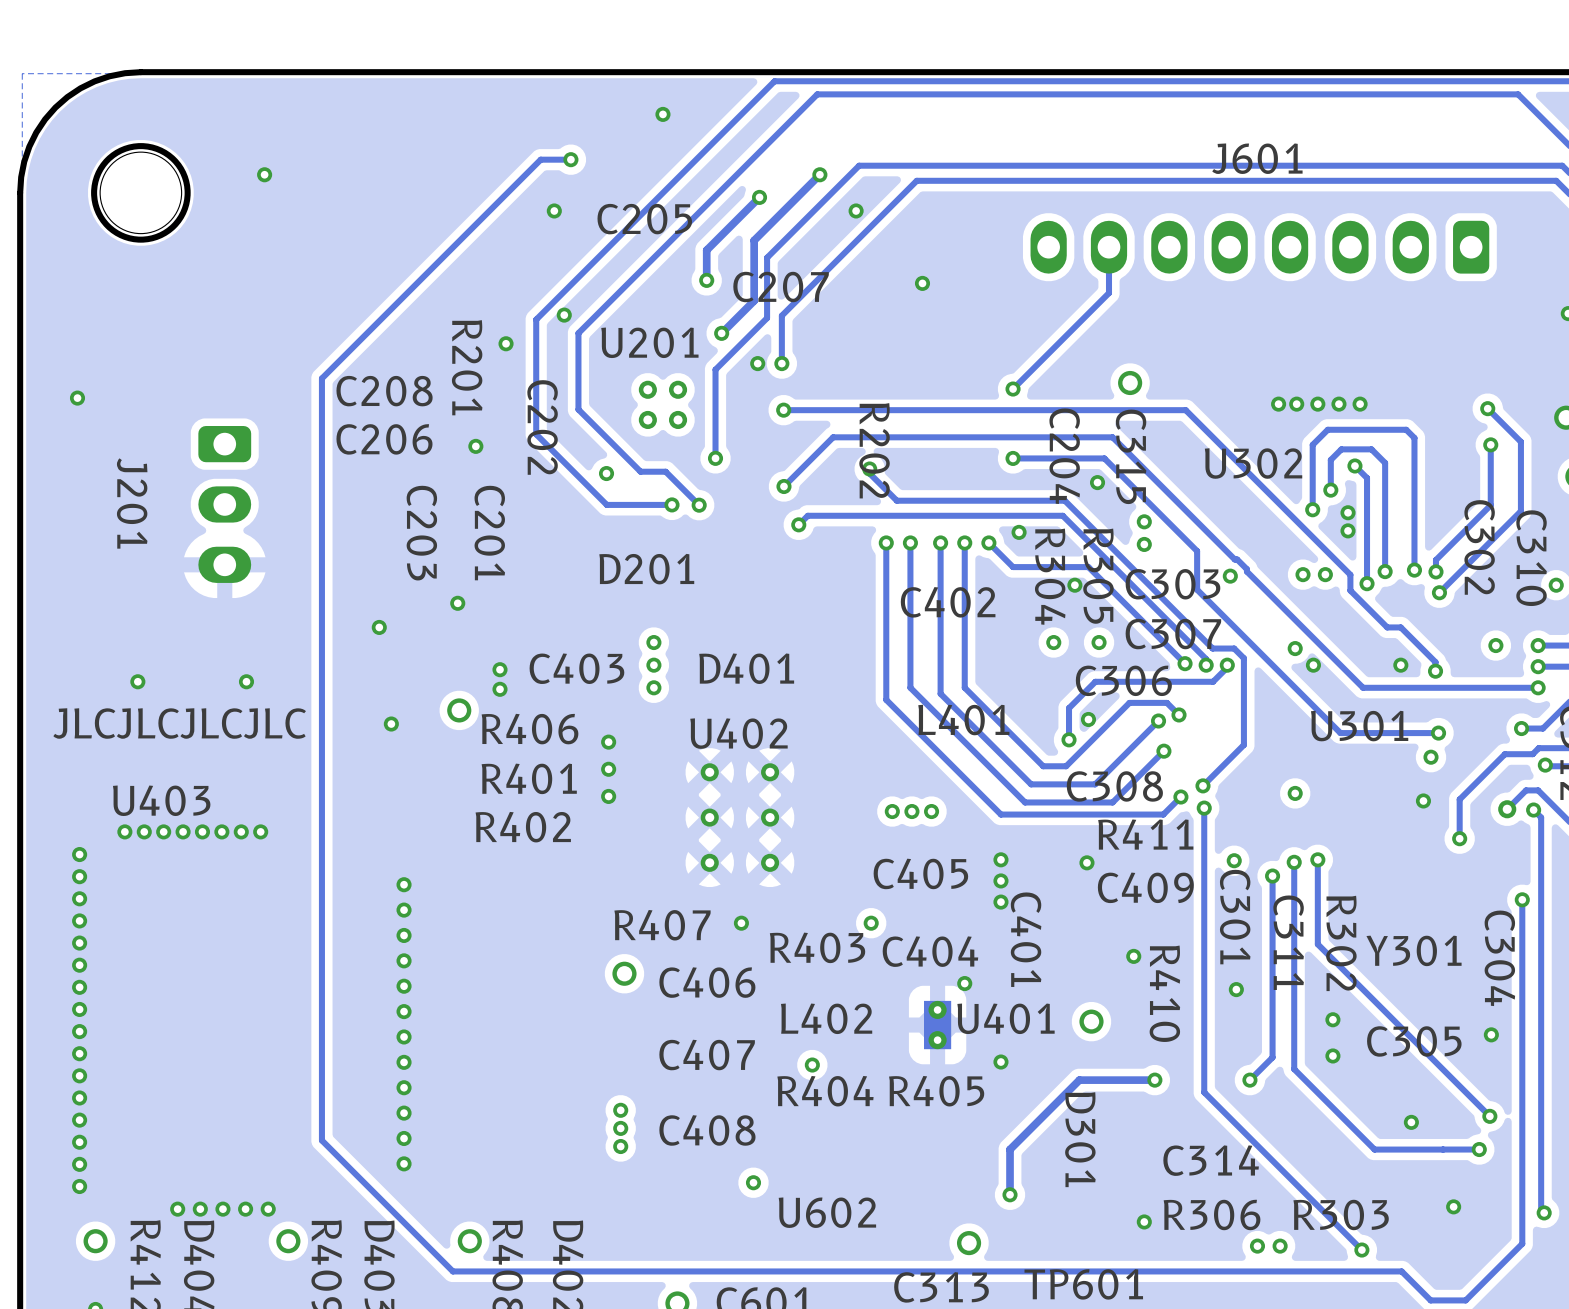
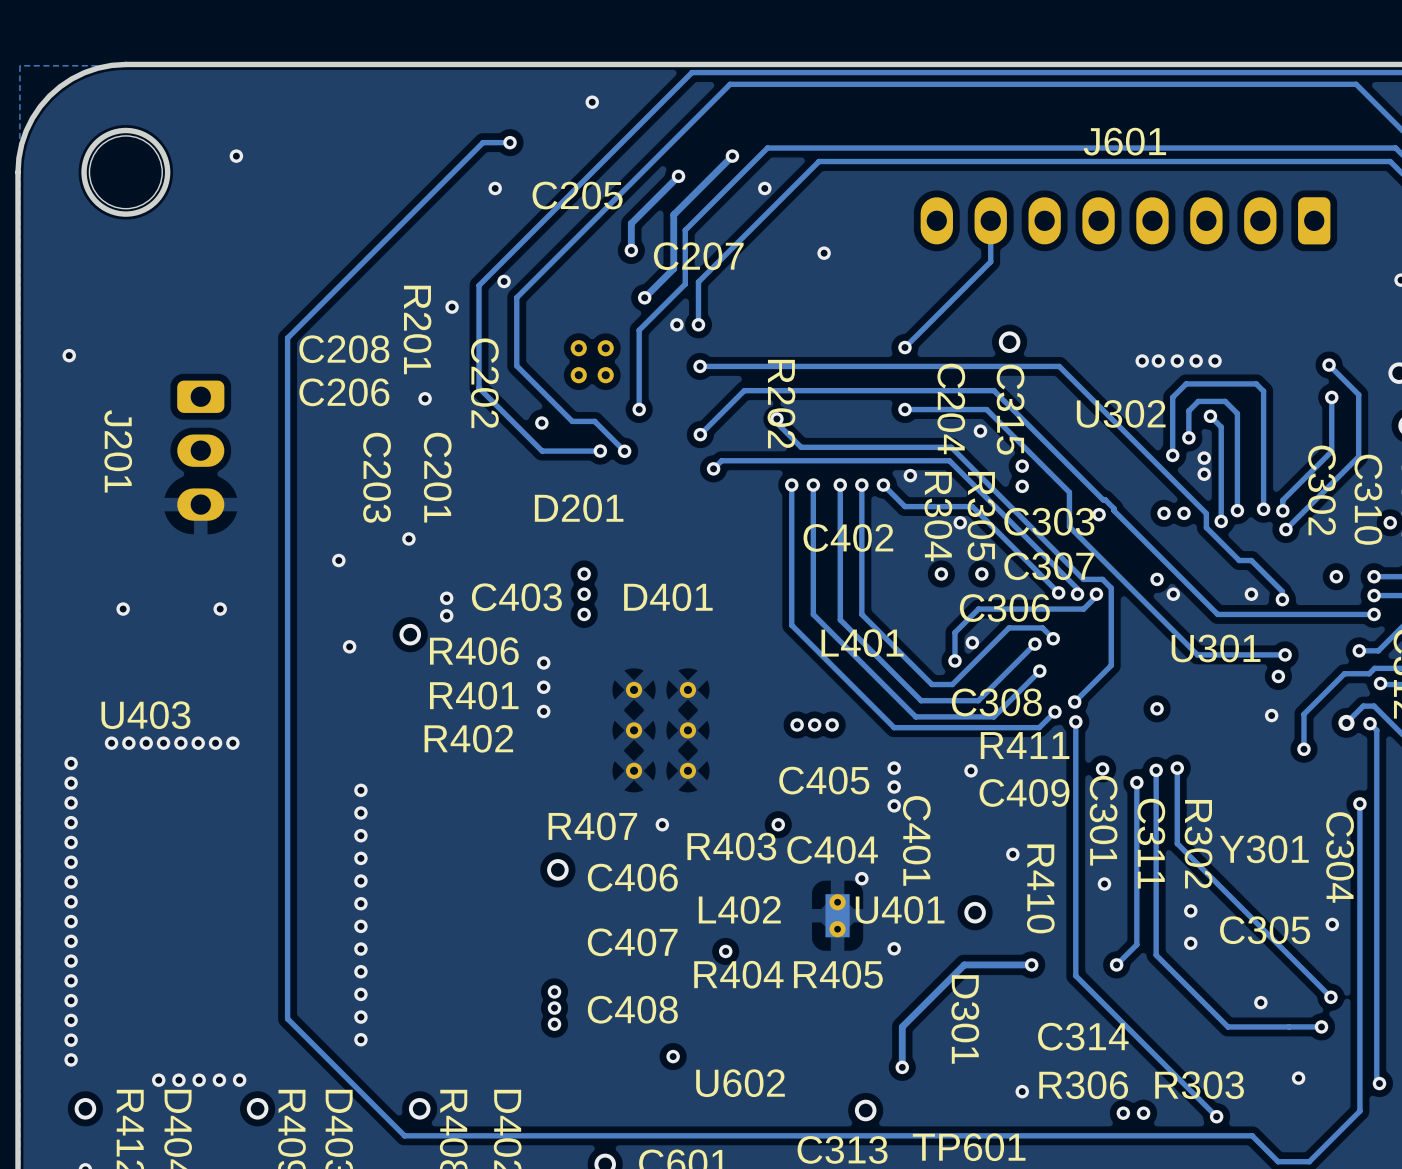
U201 name: U201 (649, 342) -> none
text: JLCJLCJLCJLC (179, 723) -> none
U402 name: U402 (738, 733) -> none

